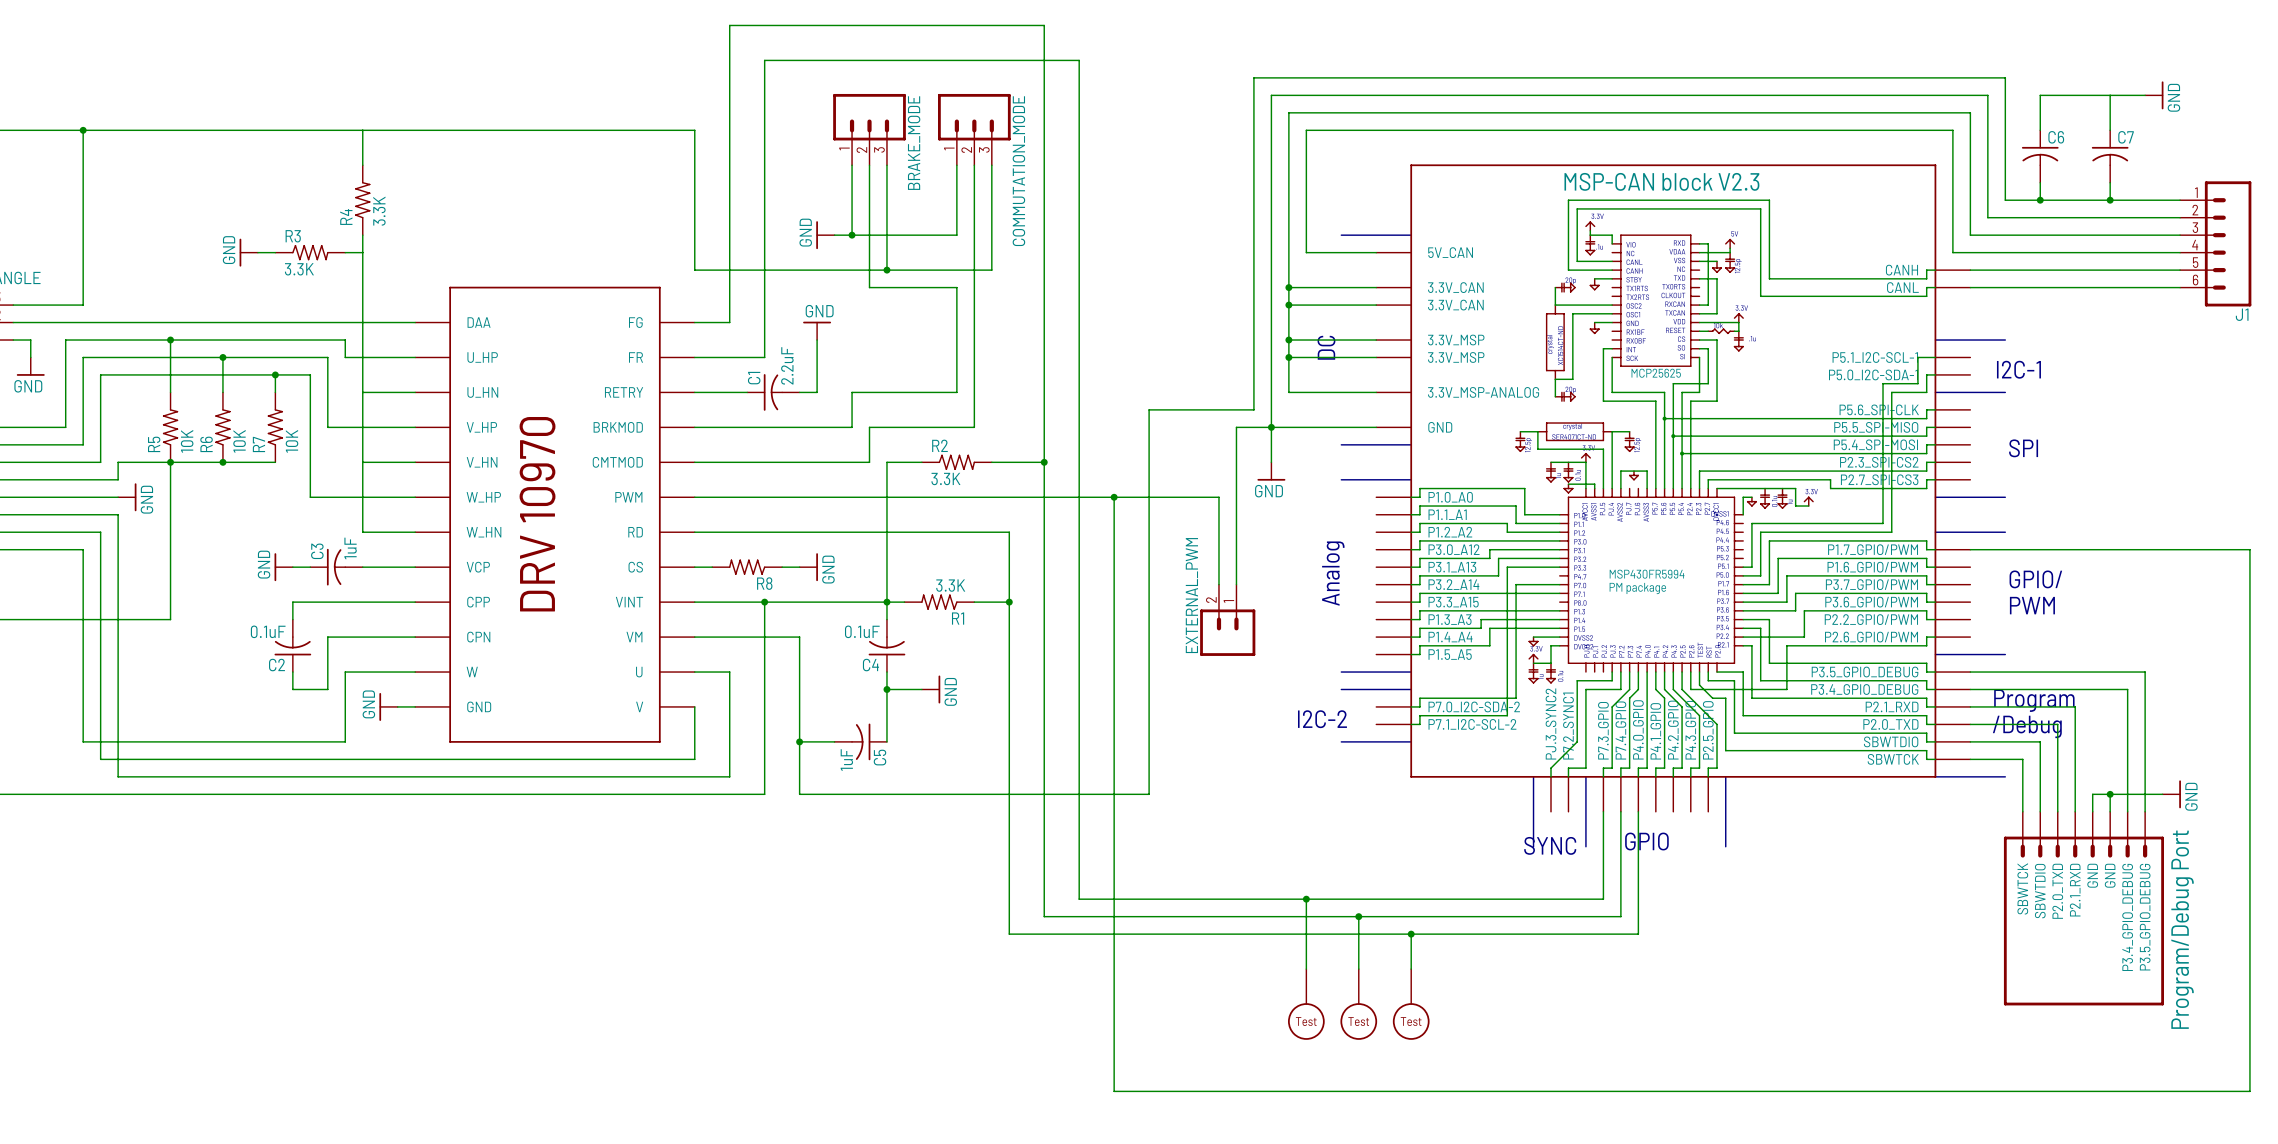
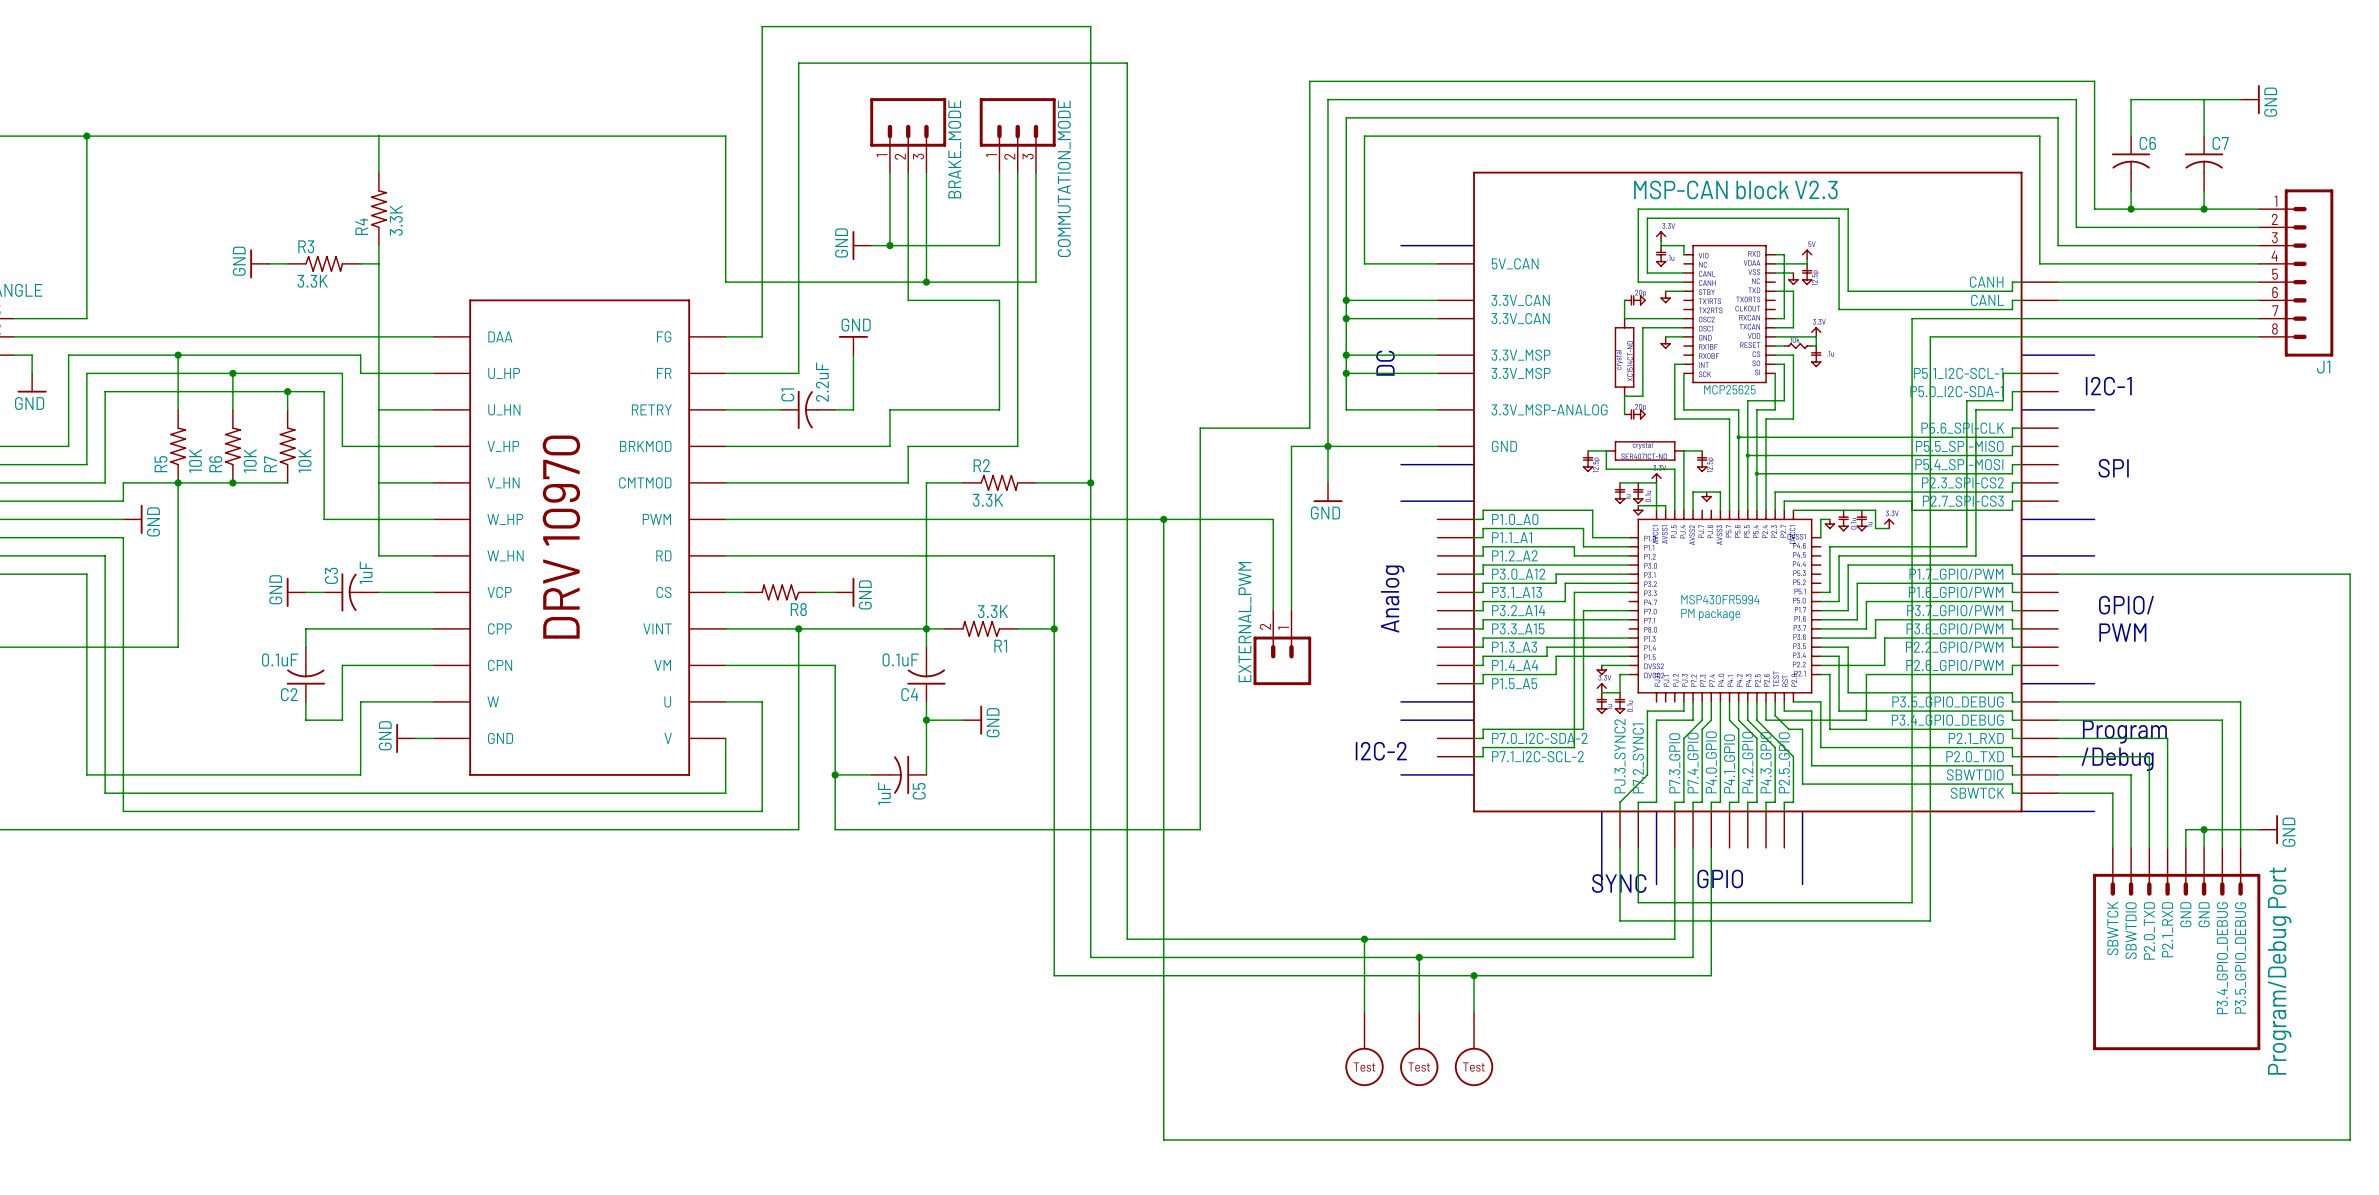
J1 symbol: [2180, 181, 2252, 307] -> [2258, 189, 2334, 357]
wire: none -> (2258, 318) (1912, 318) (1912, 902) (1638, 902) (1638, 847)
J1 name position: J1 (2242, 314) -> J1 (2323, 367)
wire: none -> (2258, 336) (1930, 336) (1930, 920) (1620, 920) (1620, 847)

